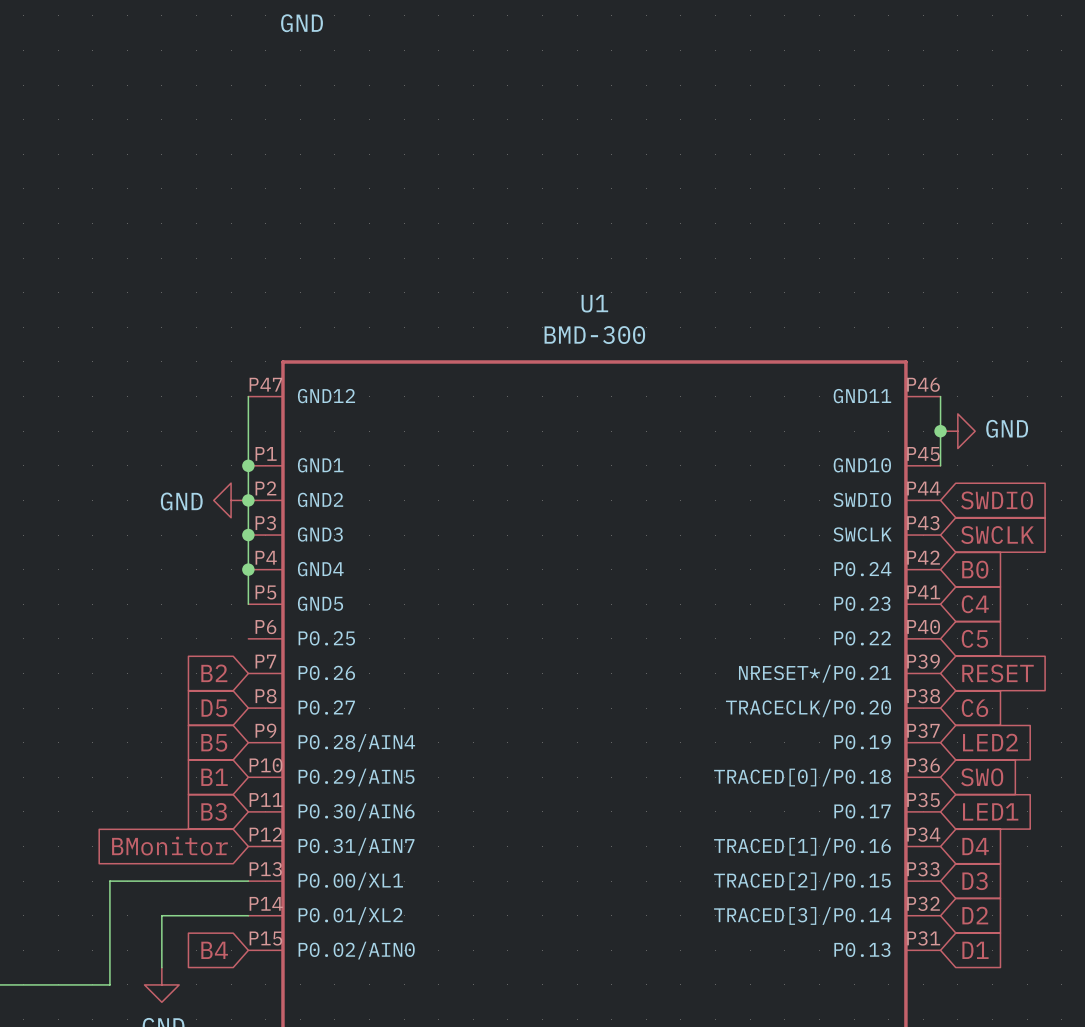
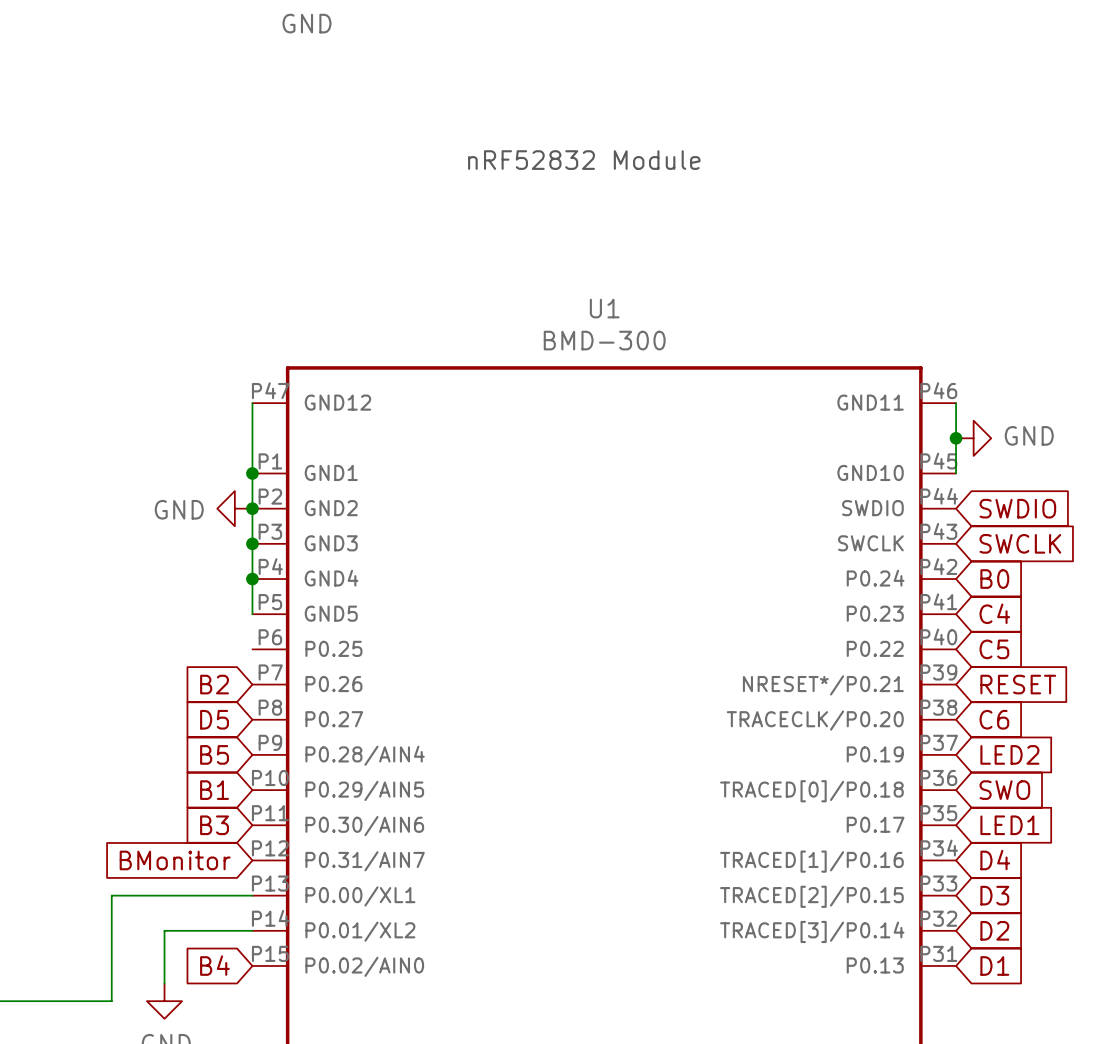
text: none -> nRF52832 Module (584, 160)

